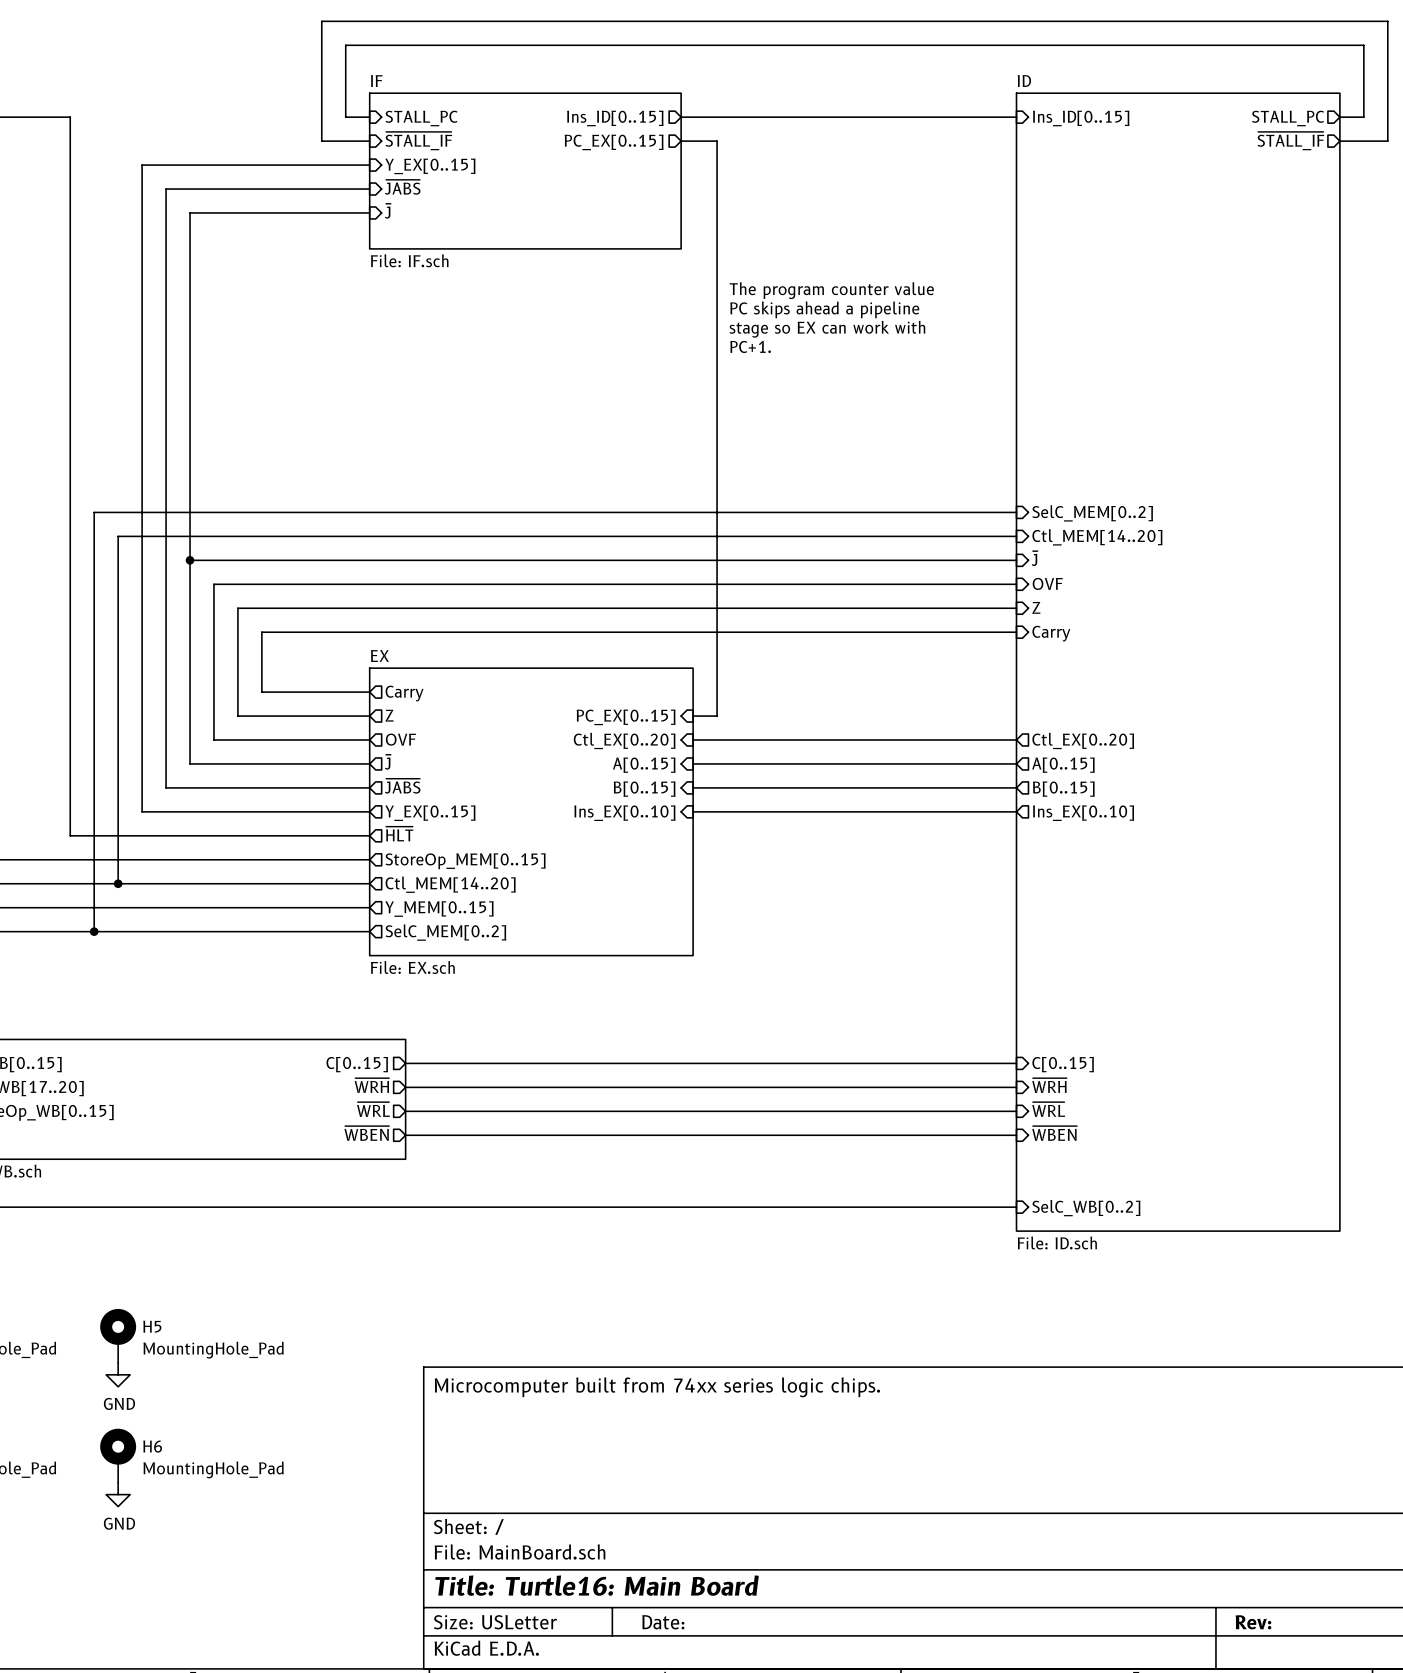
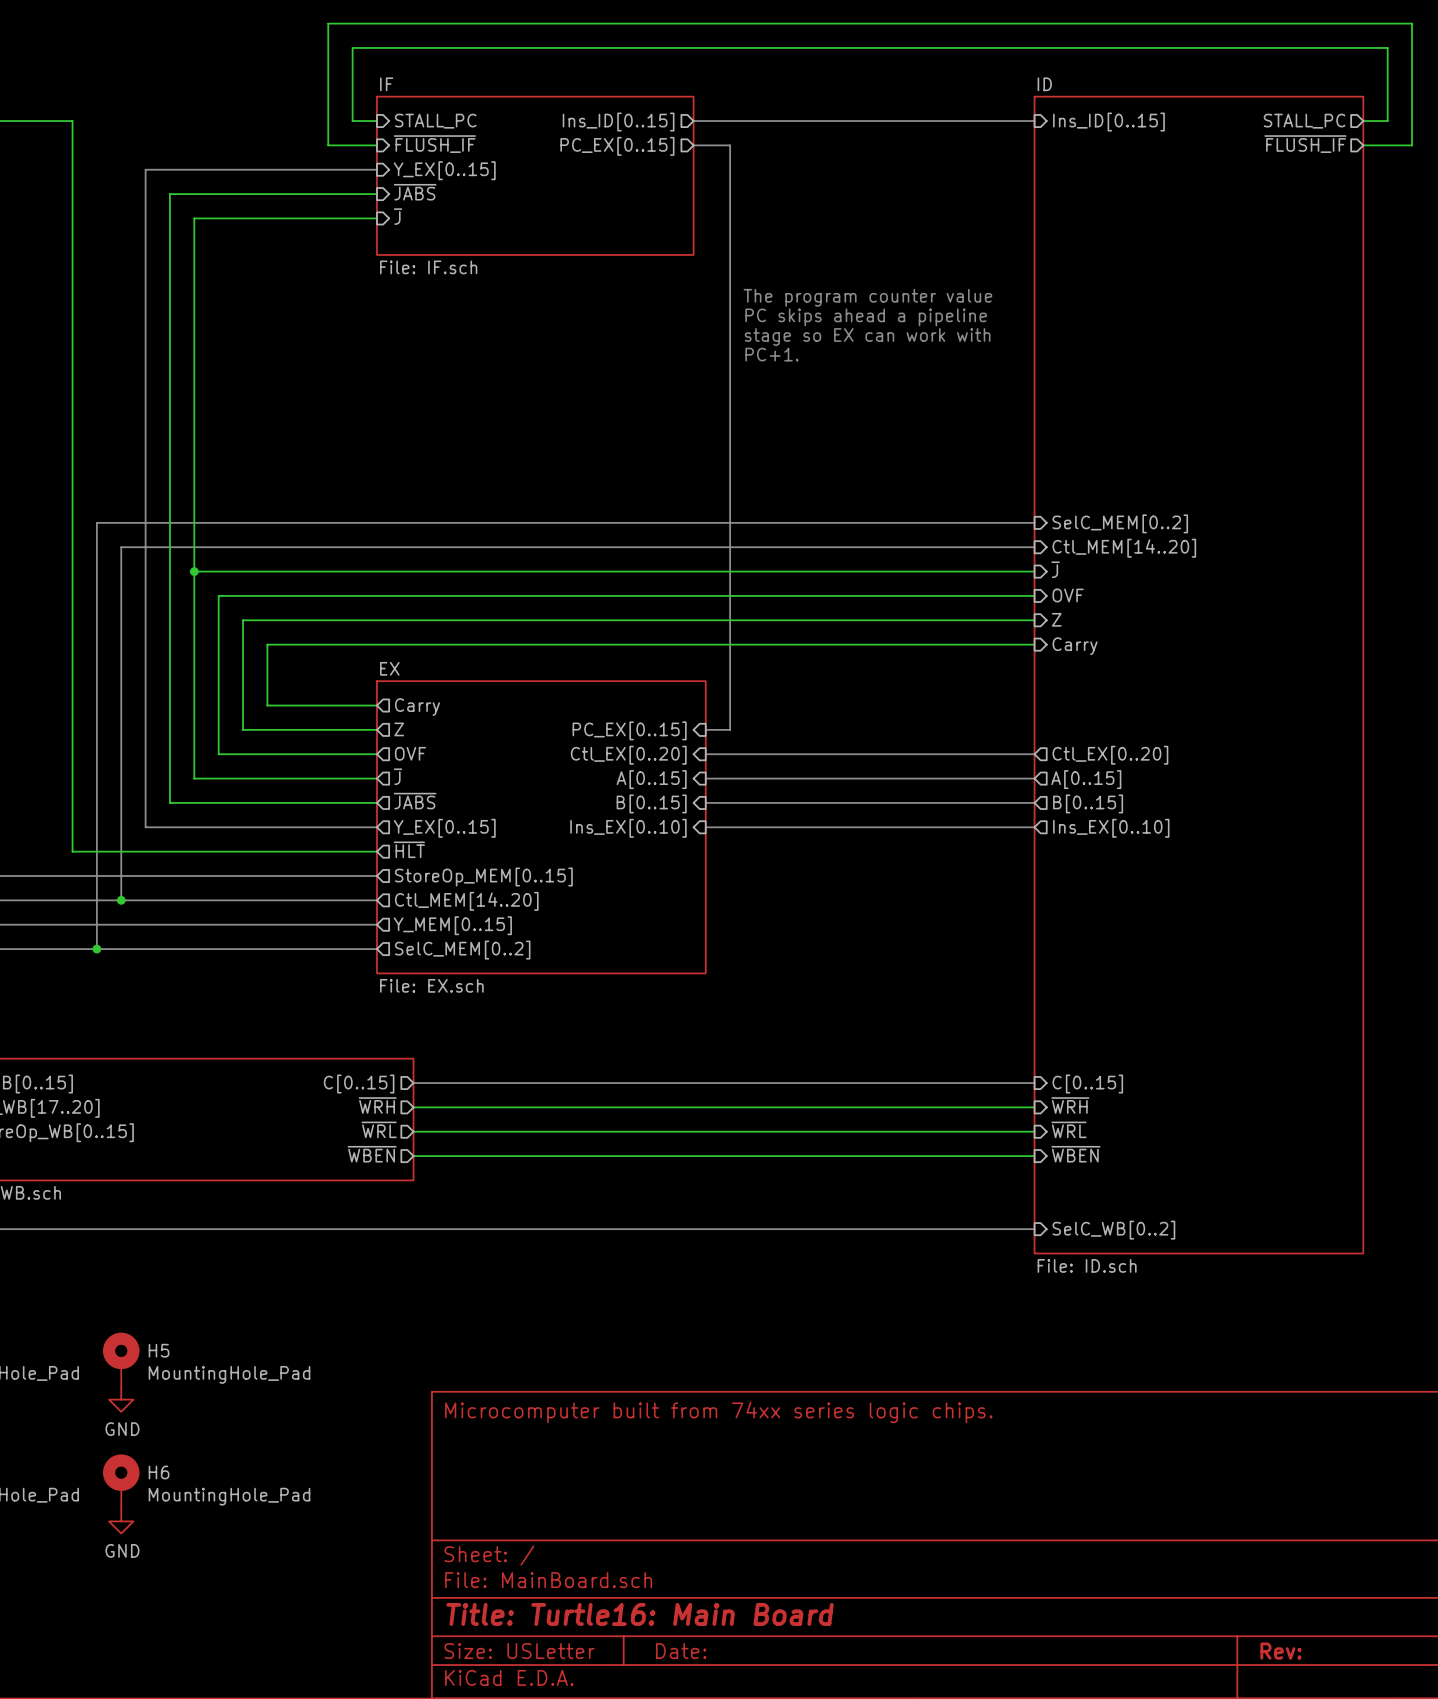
sheet pin: ~{STALL_IF} (418, 141) -> ~{FLUSH_IF} (434, 144)
sheet pin: ~{STALL_IF} (1290, 141) -> ~{FLUSH_IF} (1305, 144)

